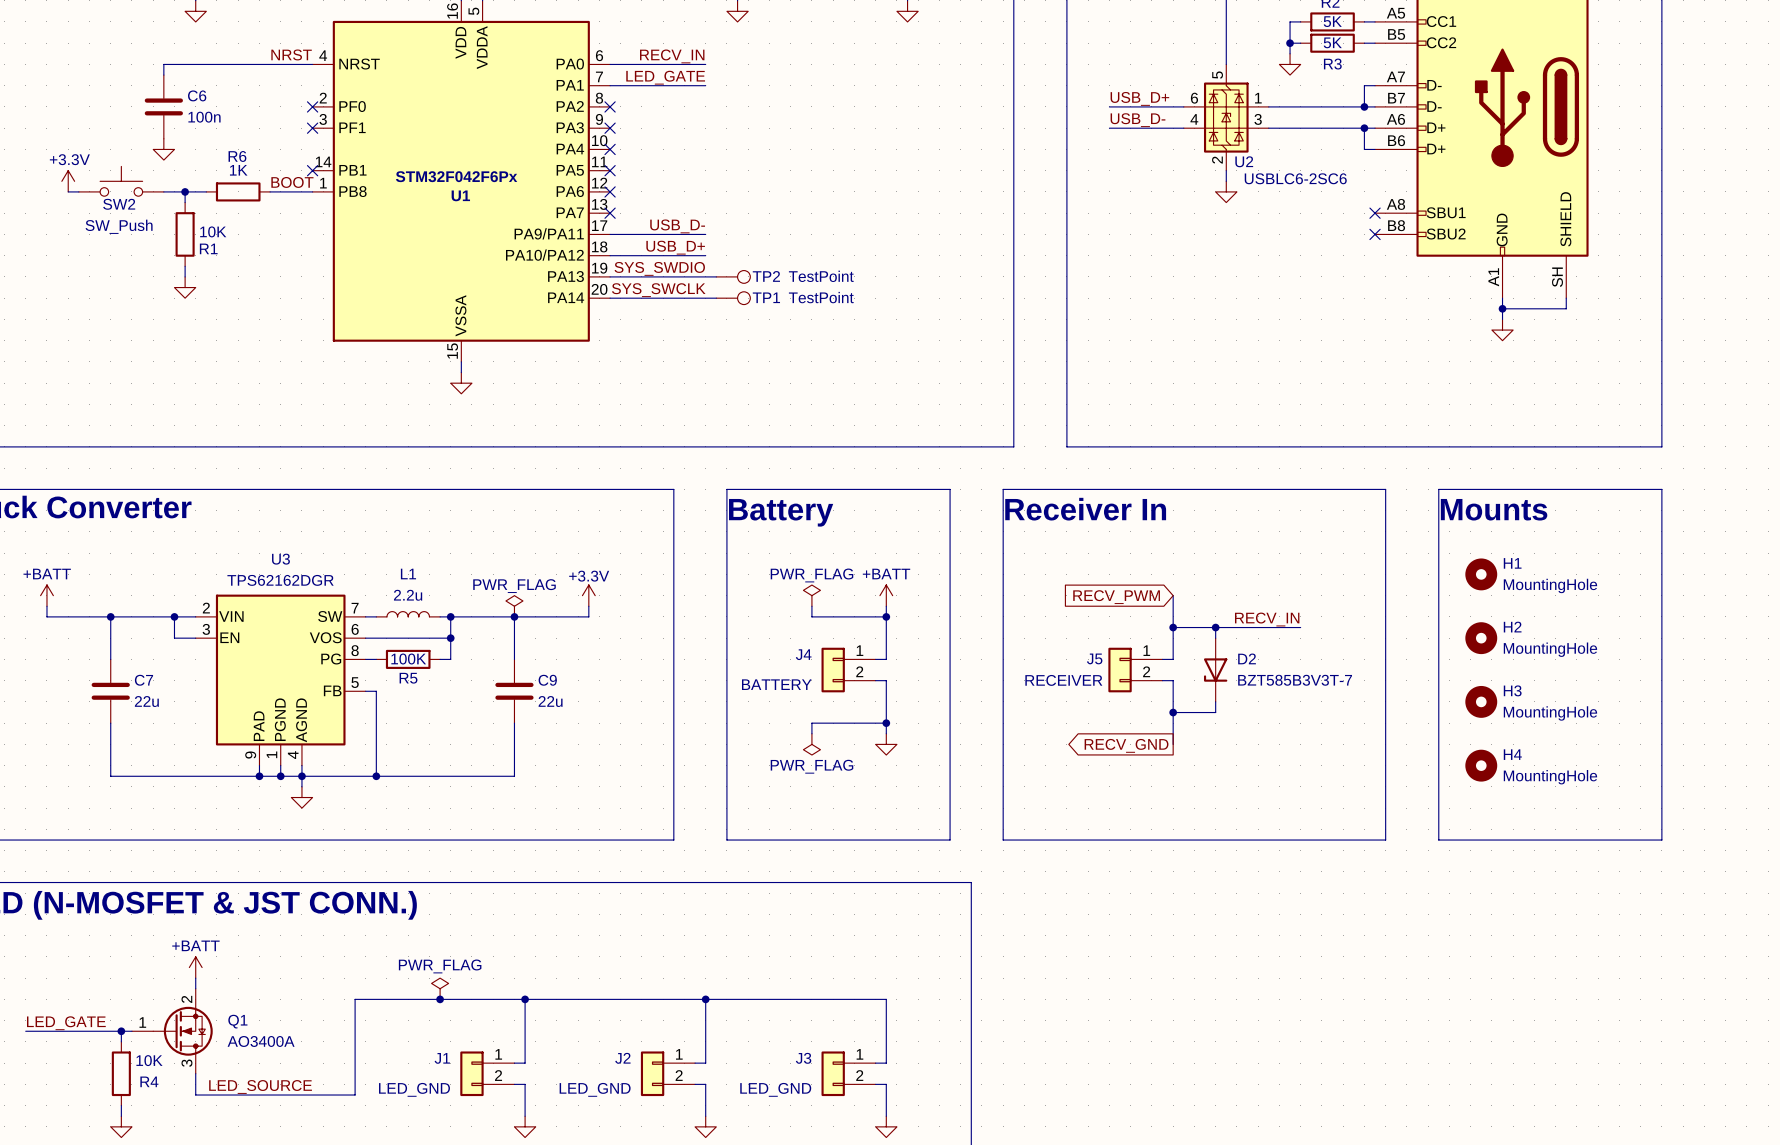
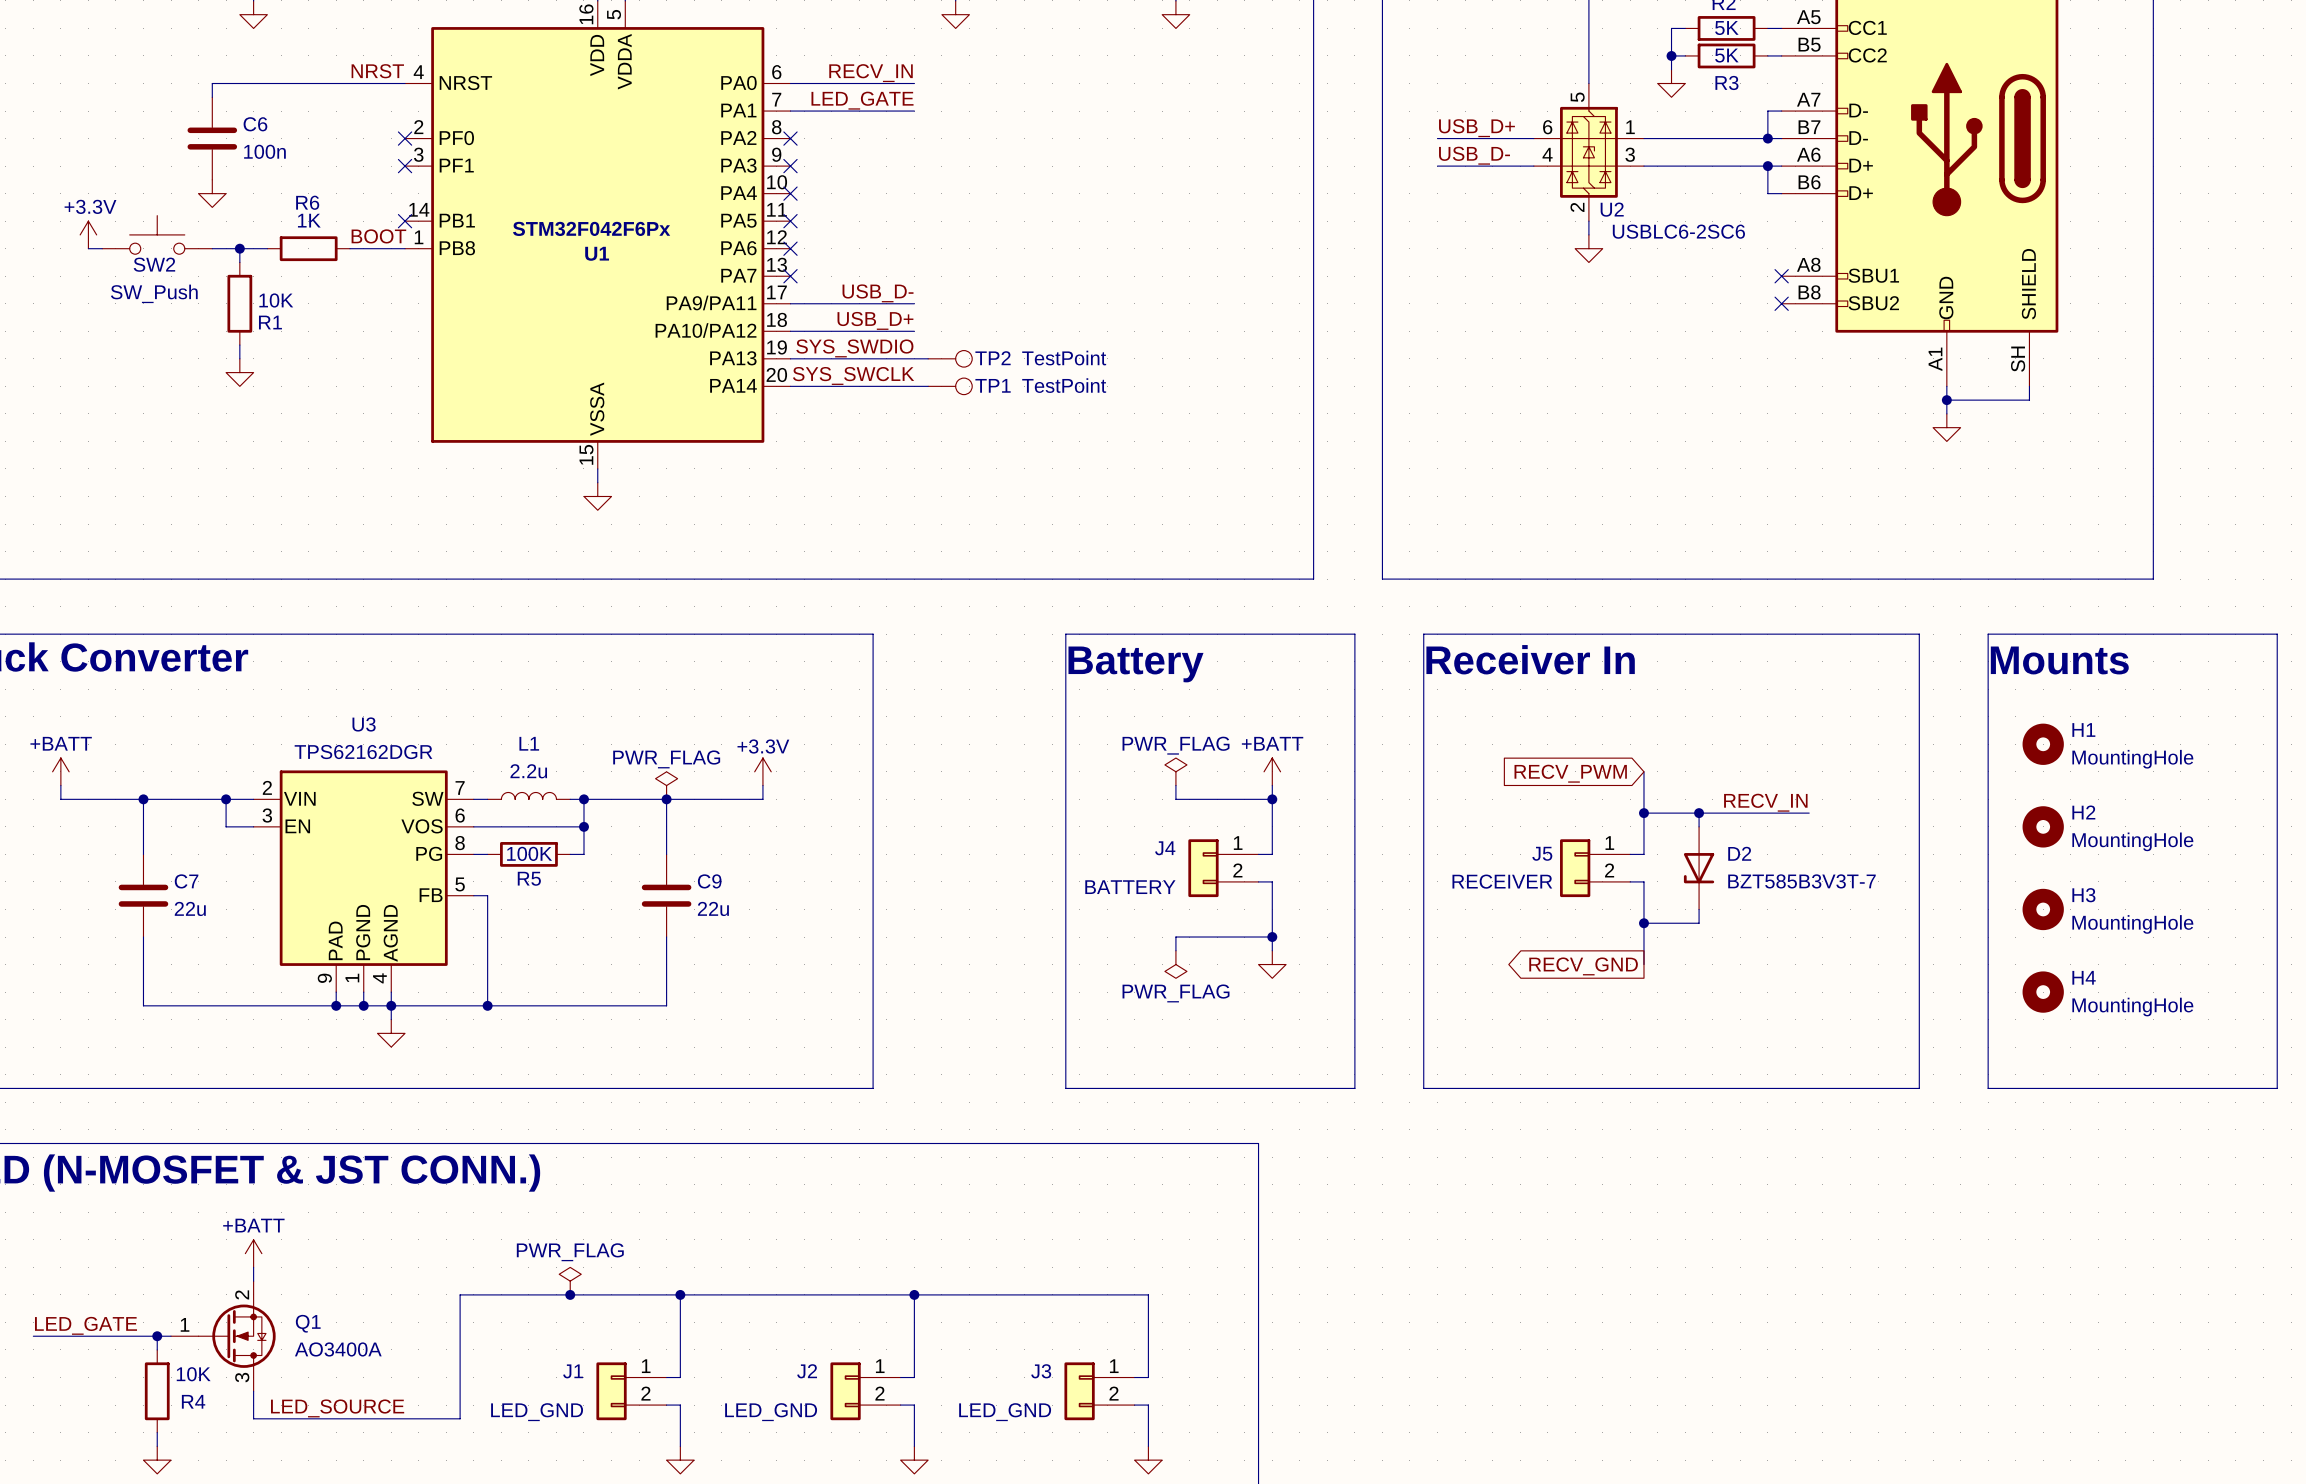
line: (822, 489) (726, 489) (726, 840) (822, 840) -> (1065, 634) (1065, 1088)
line: (950, 489) (950, 840) -> (1231, 634) (1299, 634)
line: (1003, 489) (1003, 840) -> (1231, 1088) (1299, 1088)
line: (1045, 489) (1098, 489) -> (1354, 634) (1354, 1088)
line: (1385, 489) (1385, 840) -> (1795, 634) (1864, 634)
line: (1438, 489) (1438, 840) -> (1795, 1088) (1864, 1088)
line: (1481, 489) (1534, 489) -> (1919, 634) (1919, 1088)
line: (1661, 489) (1661, 840) -> (2153, 634) (2277, 634) (2277, 1088) (2153, 1088)
text position: Receiver In (1085, 509) -> Receiver In (1530, 659)
text position: Mounts (1494, 509) -> Mounts (2059, 660)
text position: Battery (781, 512) -> Battery (1135, 664)
H1 position: (1481, 574) -> (2043, 744)
power symbol: PWR_FLAG (811, 595) -> none
power symbol position: +BATT (886, 595) -> +BATT (1272, 771)
power symbol: none -> PWR_FLAG (1175, 771)
wire: (1173, 595) (1173, 659) (1162, 659) -> (1643, 771) (1643, 854) (1630, 854)
global label position: RECV_PWM (1116, 597) -> RECV_PWM (1570, 773)
wire: (811, 606) (811, 616) (886, 616) -> (1175, 785) (1175, 799) (1272, 799)
wire: (886, 606) (886, 659) (875, 659) -> (1272, 785) (1272, 854) (1258, 854)
junction: (886, 616) -> none
junction: none -> (1272, 799)
label position: RECV_IN (1267, 619) -> RECV_IN (1765, 802)
wire: (1173, 627) (1268, 627) -> (1685, 813) (1809, 813)
junction: (1173, 627) -> none
wire: (1215, 627) (1215, 638) -> (1699, 813) (1699, 826)
junction: (1215, 627) -> none
junction: none -> (1643, 813)
junction: none -> (1699, 813)
H2 position: (1481, 638) -> (2043, 826)
J4 position: (848, 670) -> (1223, 868)
J5 position: (1135, 670) -> (1595, 868)
D2 position: (1215, 670) -> (1699, 868)
wire: (875, 680) (886, 680) (886, 733) -> (1258, 881) (1272, 881) (1272, 950)
wire: (1162, 680) (1173, 680) (1173, 744) -> (1630, 881) (1643, 881) (1643, 964)
wire: (1215, 701) (1215, 712) (1173, 712) -> (1699, 909) (1699, 923) (1643, 923)
H3 position: (1481, 701) -> (2043, 909)
junction: (1173, 712) -> none
junction: none -> (1643, 923)
wire: (886, 723) (811, 723) (811, 733) -> (1272, 937) (1175, 937) (1175, 950)
junction: (886, 723) -> none
junction: none -> (1272, 937)
power symbol: PWR_FLAG (811, 744) -> none
power symbol position: (886, 744) -> (1272, 964)
power symbol: none -> PWR_FLAG (1175, 964)
global label position: RECV_GND (1126, 745) -> RECV_GND (1583, 966)
H4 position: (1481, 765) -> (2043, 992)
line: (1045, 840) (1098, 840) -> (1423, 634) (1423, 1088)
line: (1481, 840) (1534, 840) -> (1988, 634) (1988, 1088)

